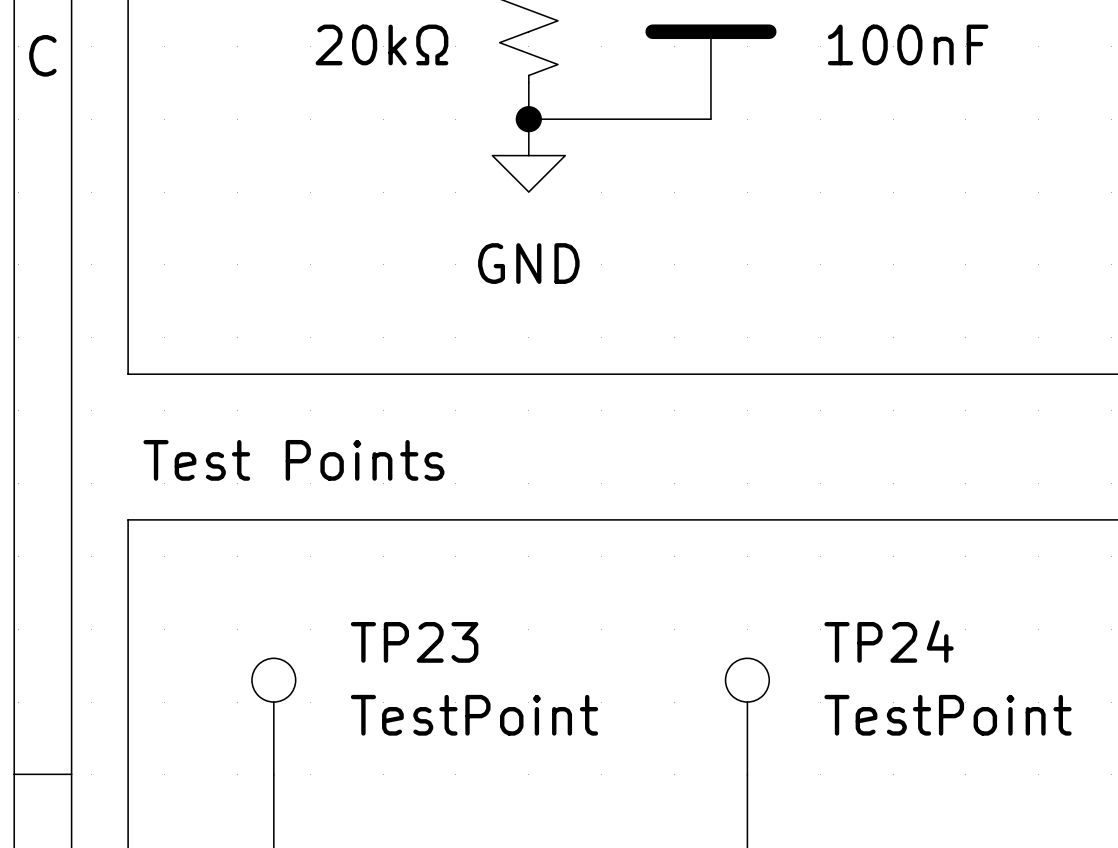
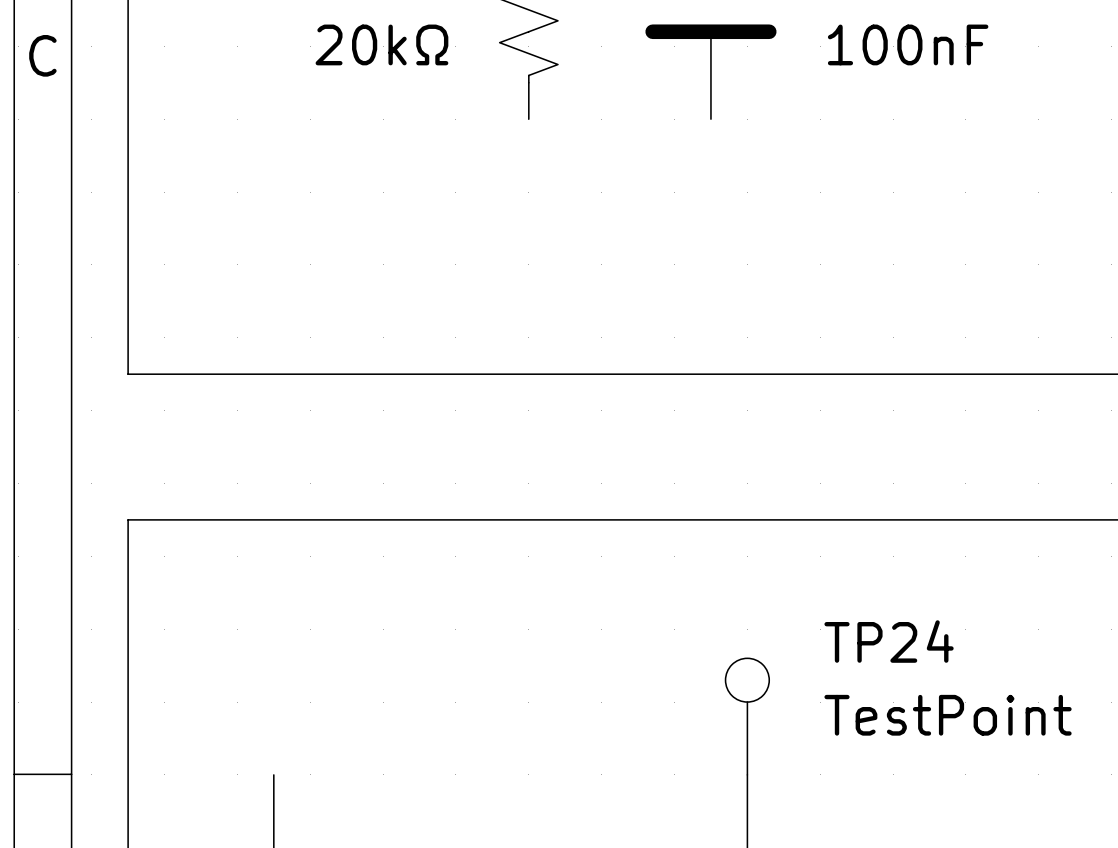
wire: (528, 119) (710, 119) -> none
junction: (528, 119) -> none
power symbol: GND (528, 155) -> none
text: Test Points (293, 460) -> none
TP23: TestPoint (273, 716) -> none

